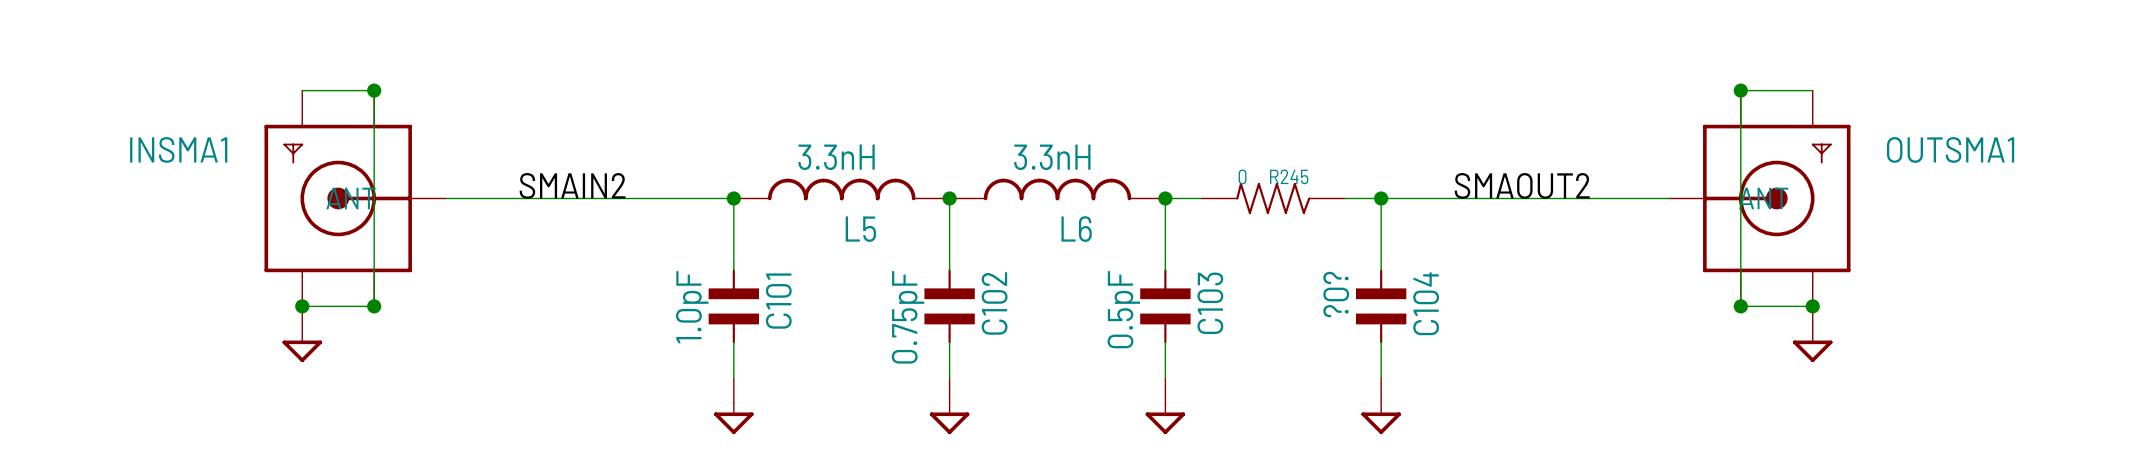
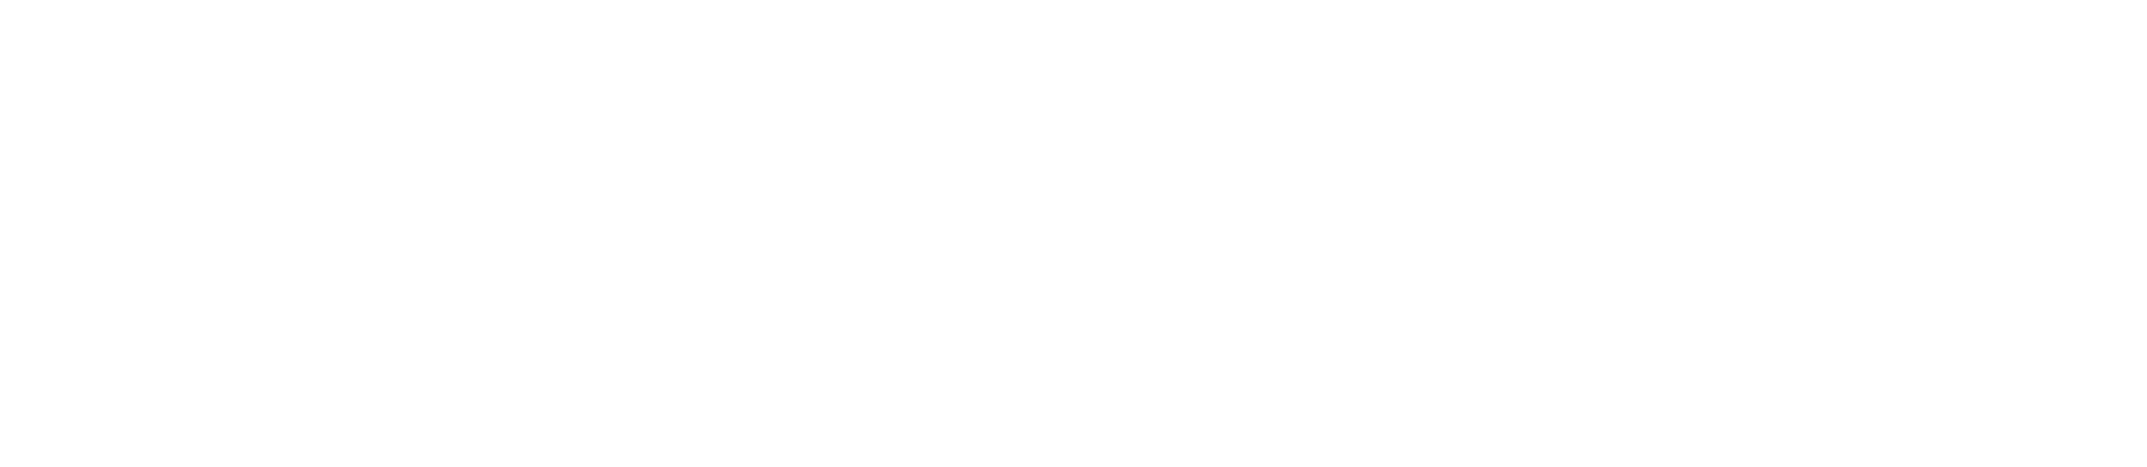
wire: (302, 90) (374, 90) (374, 306) (302, 306) -> none
junction: (374, 90) -> none
junction: (1740, 90) -> none
wire: (1812, 90) (1740, 90) (1740, 306) (1812, 306) -> none
label: SMAIN2 (572, 185) -> none
label: SMAOUT2 (1522, 185) -> none
L5: 3.3nH (841, 189) -> none
L6: 3.3nH (1057, 189) -> none
INSMA1: (355, 198) -> none
wire: (446, 198) (733, 198) (733, 270) -> none
junction: (733, 198) -> none
wire: (949, 198) (949, 270) -> none
junction: (949, 198) -> none
junction: (1165, 198) -> none
wire: (1201, 198) (1165, 198) (1165, 270) -> none
R245: 0 (1273, 198) -> none
wire: (1345, 198) (1668, 198) -> none
wire: (1381, 198) (1381, 270) -> none
junction: (1381, 198) -> none
OUTSMA1: (1759, 198) -> none
junction: (302, 306) -> none
junction: (374, 306) -> none
C101: 1.0pF (733, 306) -> none
C102: 0.75pF (949, 306) -> none
C103: 0.5pF (1165, 306) -> none
C104: ?0? (1381, 306) -> none
junction: (1740, 306) -> none
junction: (1812, 306) -> none
power symbol: (302, 334) -> none
power symbol: (1812, 334) -> none
wire: (733, 342) (733, 378) -> none
wire: (949, 342) (949, 378) -> none
wire: (1165, 342) (1165, 378) -> none
wire: (1381, 342) (1381, 378) -> none
power symbol: (733, 406) -> none
power symbol: (949, 406) -> none
power symbol: (1165, 406) -> none
power symbol: (1381, 406) -> none

